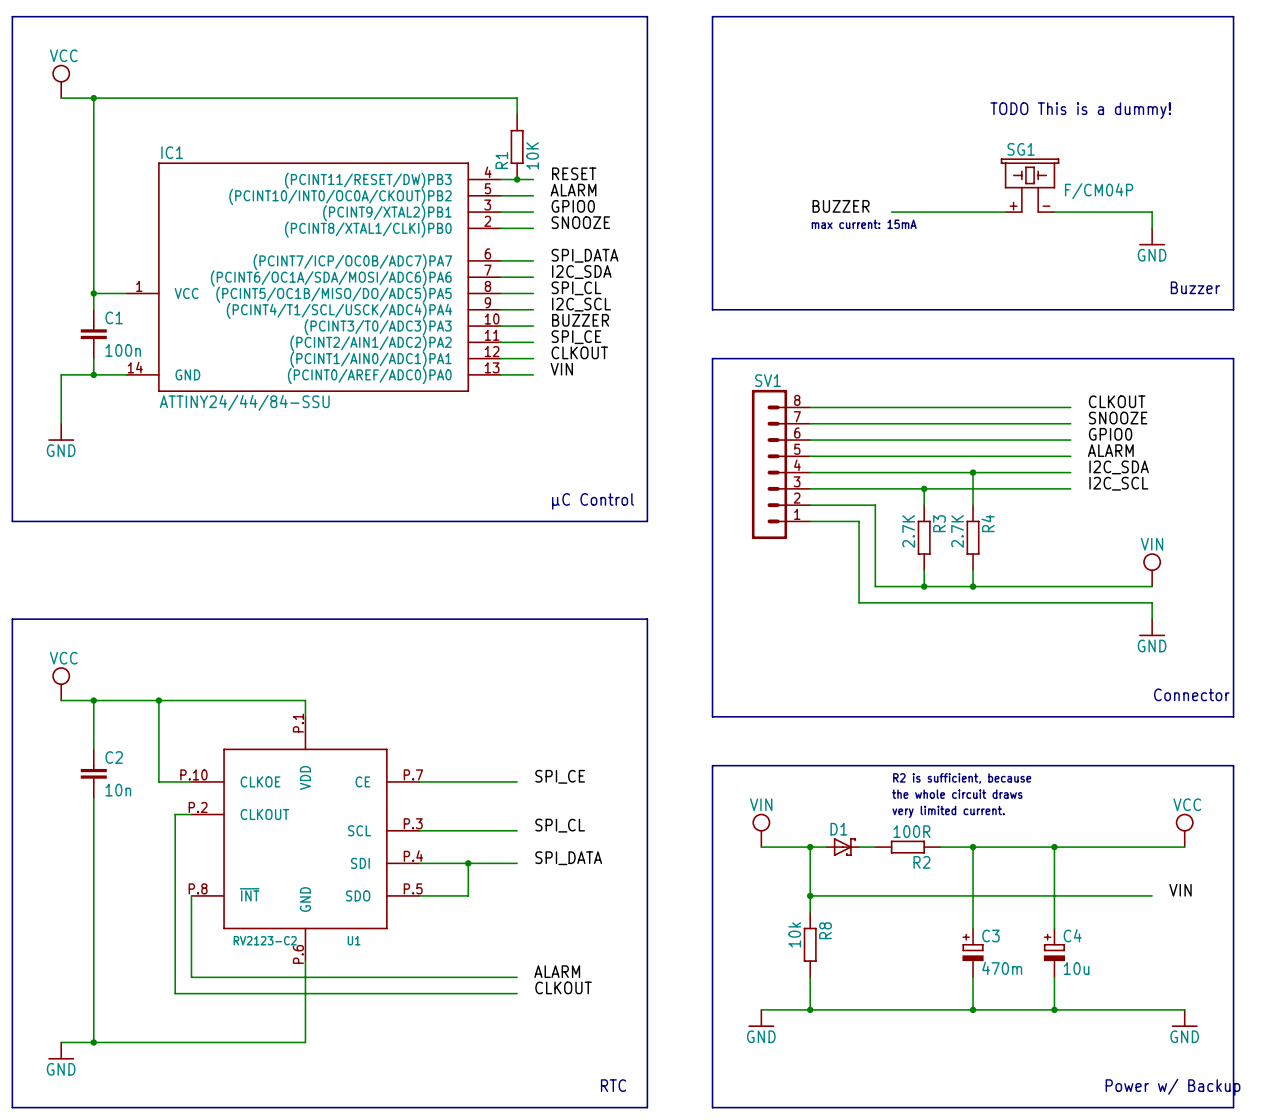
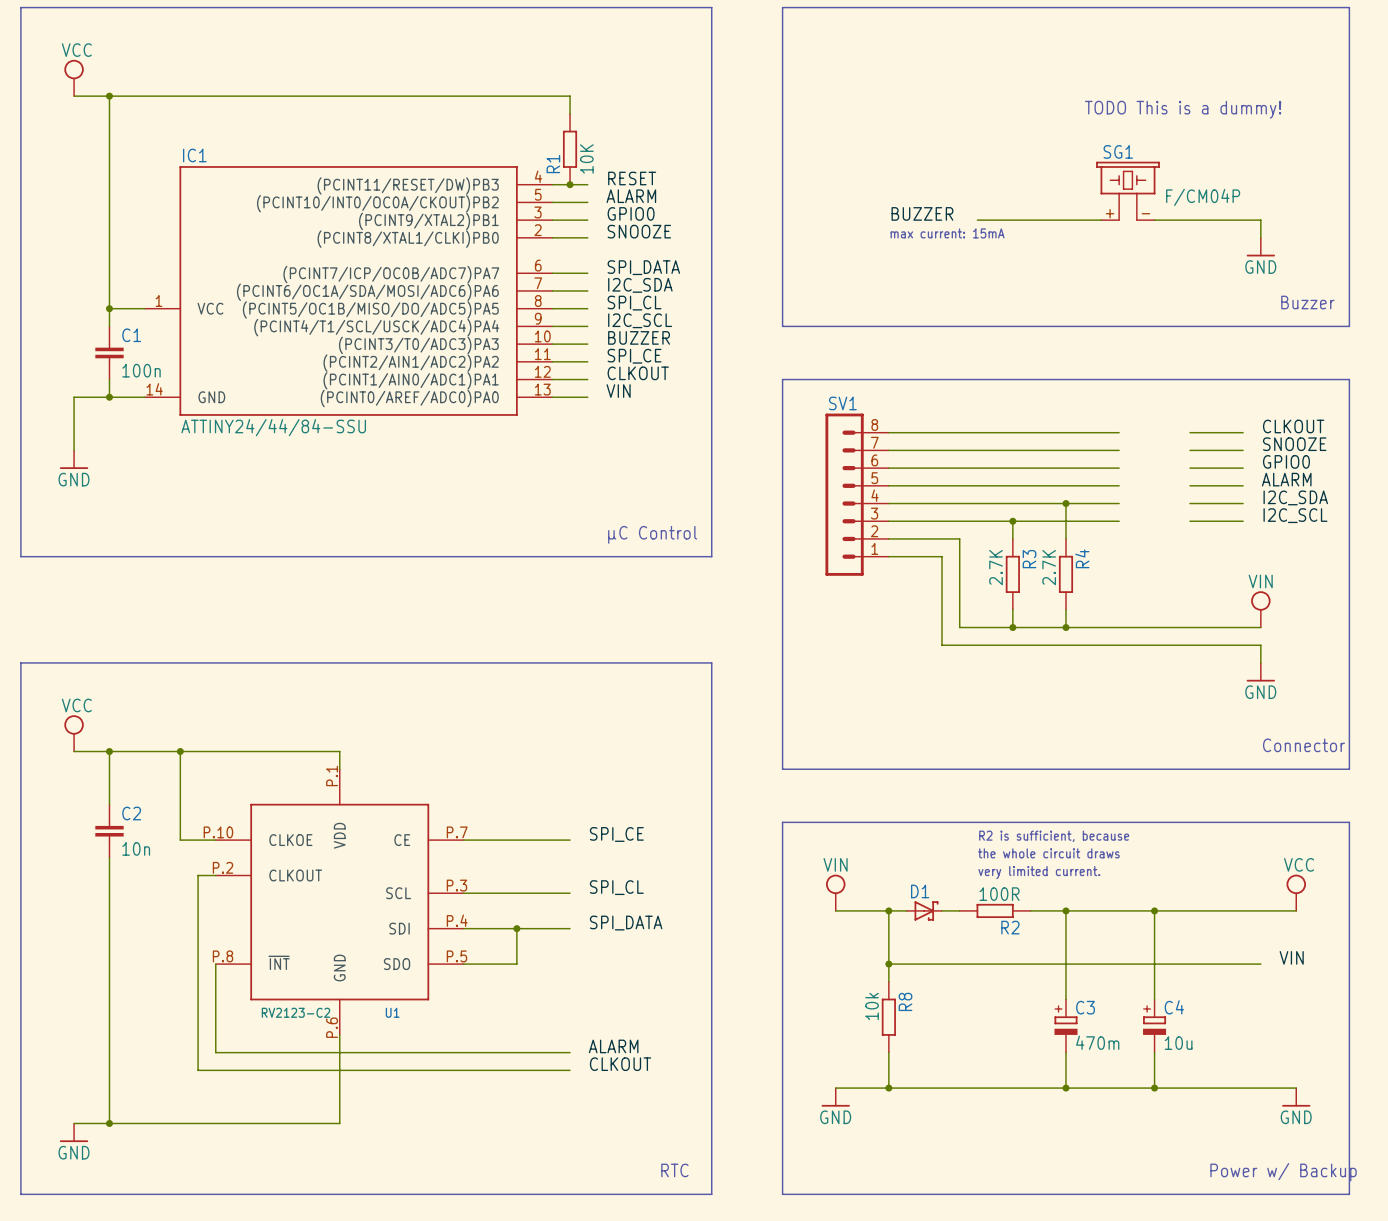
label position: CLKOUT (1117, 401) -> CLKOUT (1293, 426)
wire: (1021, 407) (1070, 407) -> (1189, 432) (1243, 432)
label position: SNOOZE (1118, 418) -> SNOOZE (1294, 444)
wire: (1021, 423) (1070, 423) -> (1189, 450) (1243, 450)
label position: GPIO0 (1110, 434) -> GPIO0 (1286, 461)
wire: (1021, 440) (1070, 440) -> (1189, 468) (1243, 468)
label position: ALARM (1110, 450) -> ALARM (1286, 479)
wire: (1021, 456) (1070, 456) -> (1189, 485) (1243, 485)
label position: I2C_SDA (1119, 467) -> I2C_SDA (1295, 497)
wire: (1021, 472) (1070, 472) -> (1189, 503) (1243, 503)
label position: I2C_SCL (1118, 483) -> I2C_SCL (1295, 515)
wire: (1021, 488) (1070, 488) -> (1189, 521) (1243, 521)

